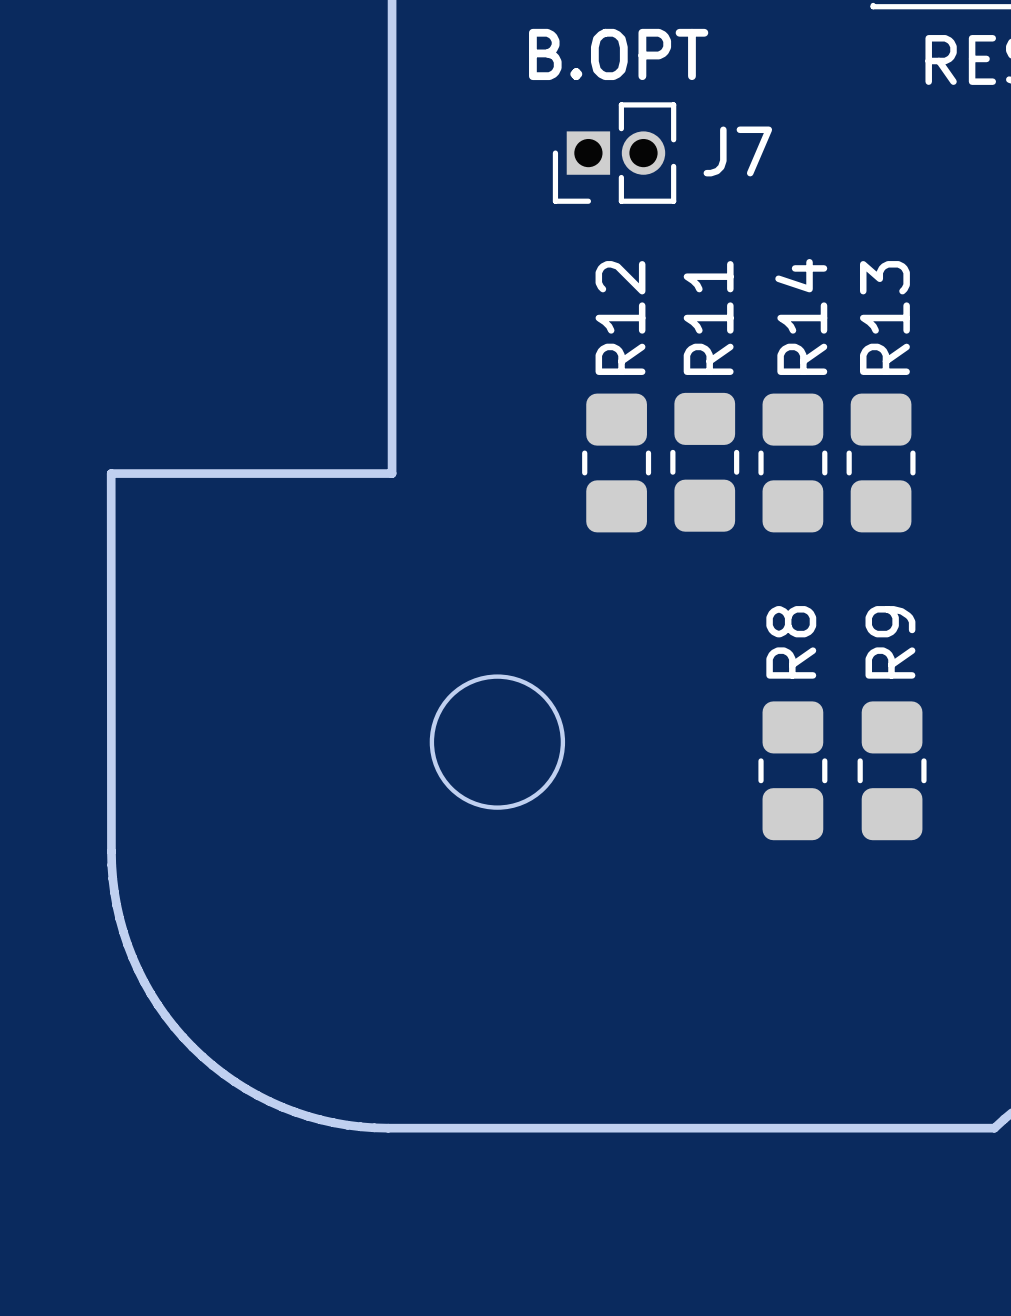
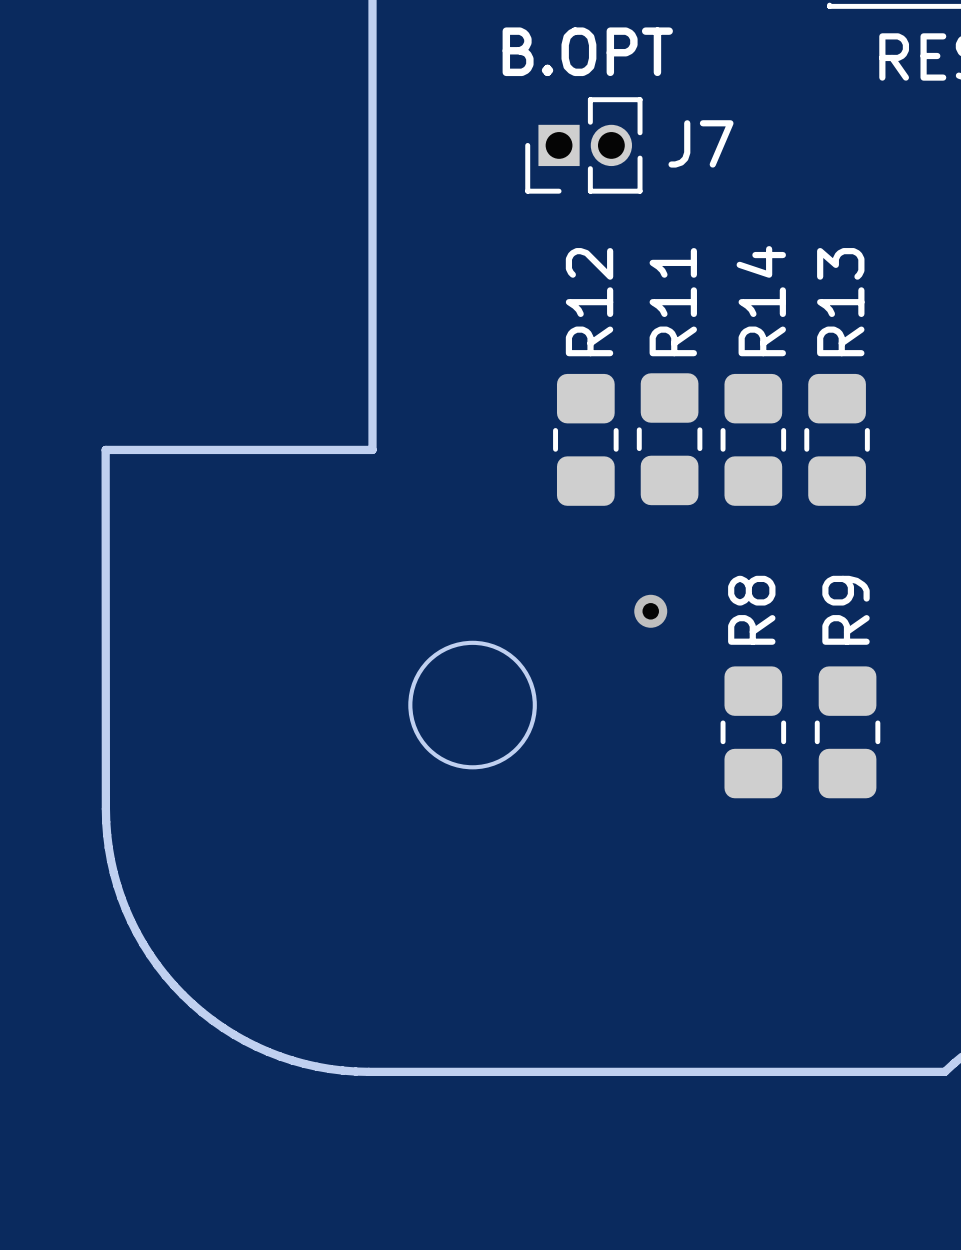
via: none -> (650, 611)

